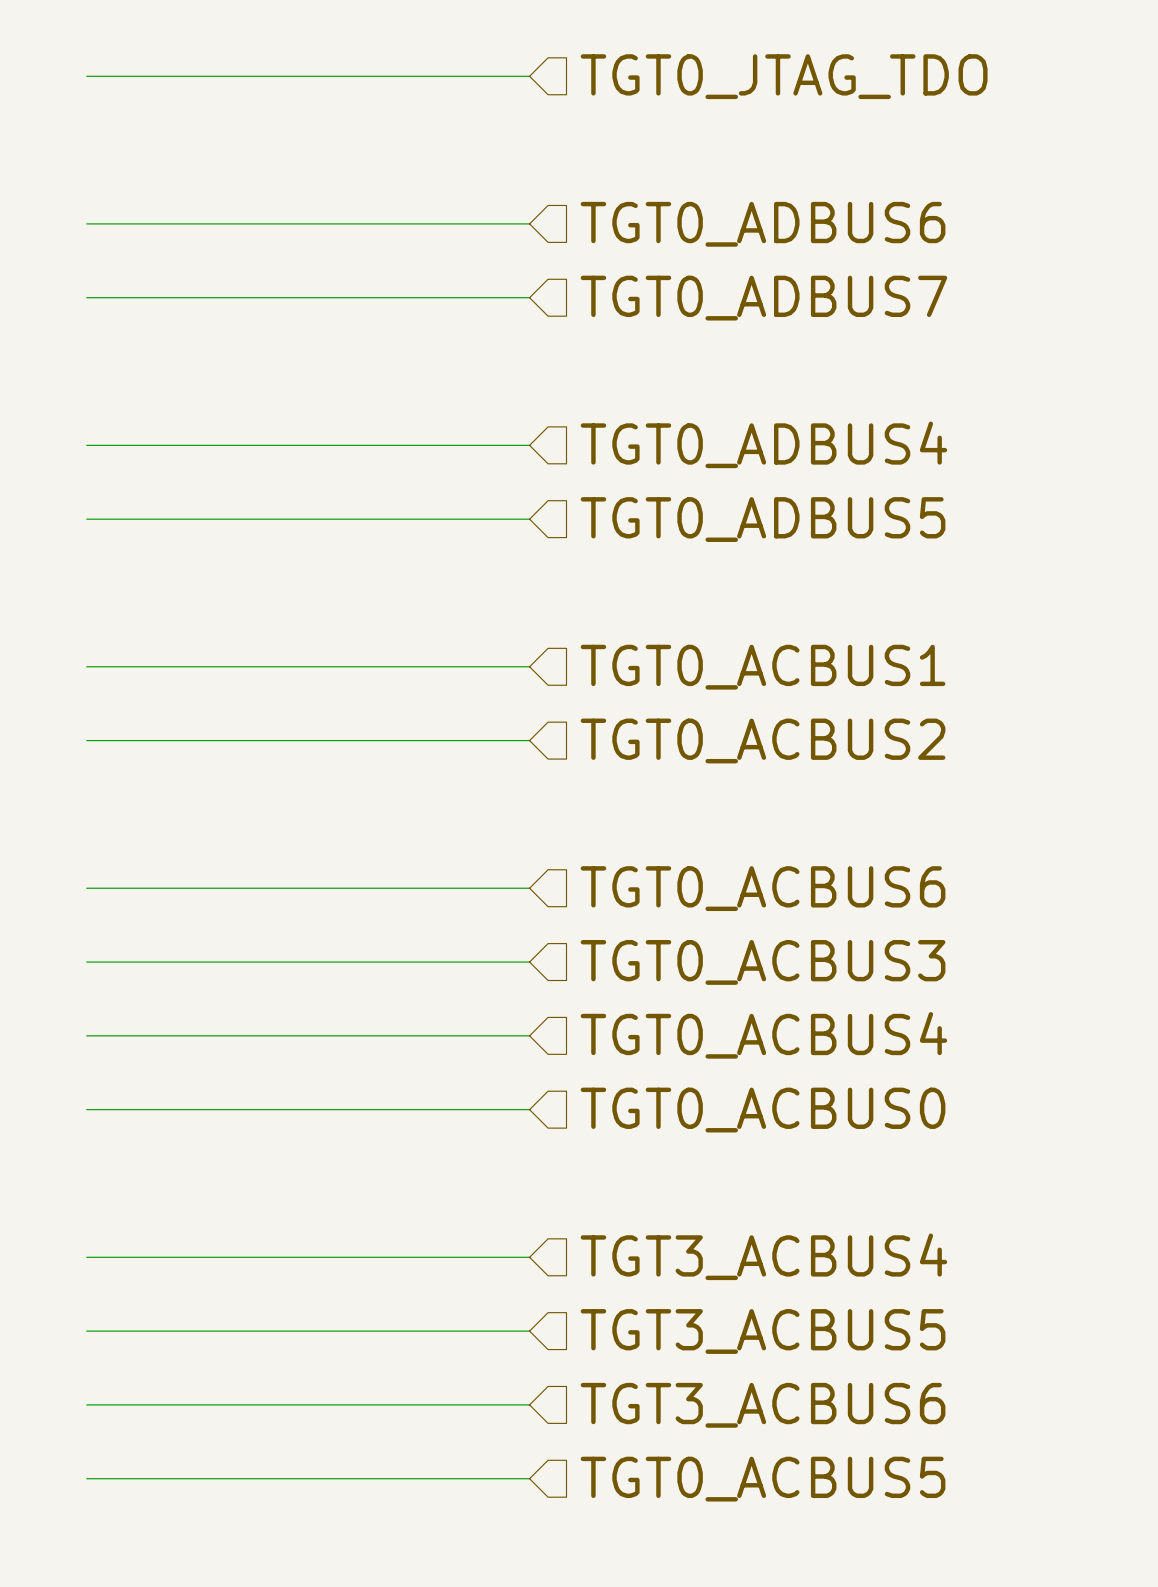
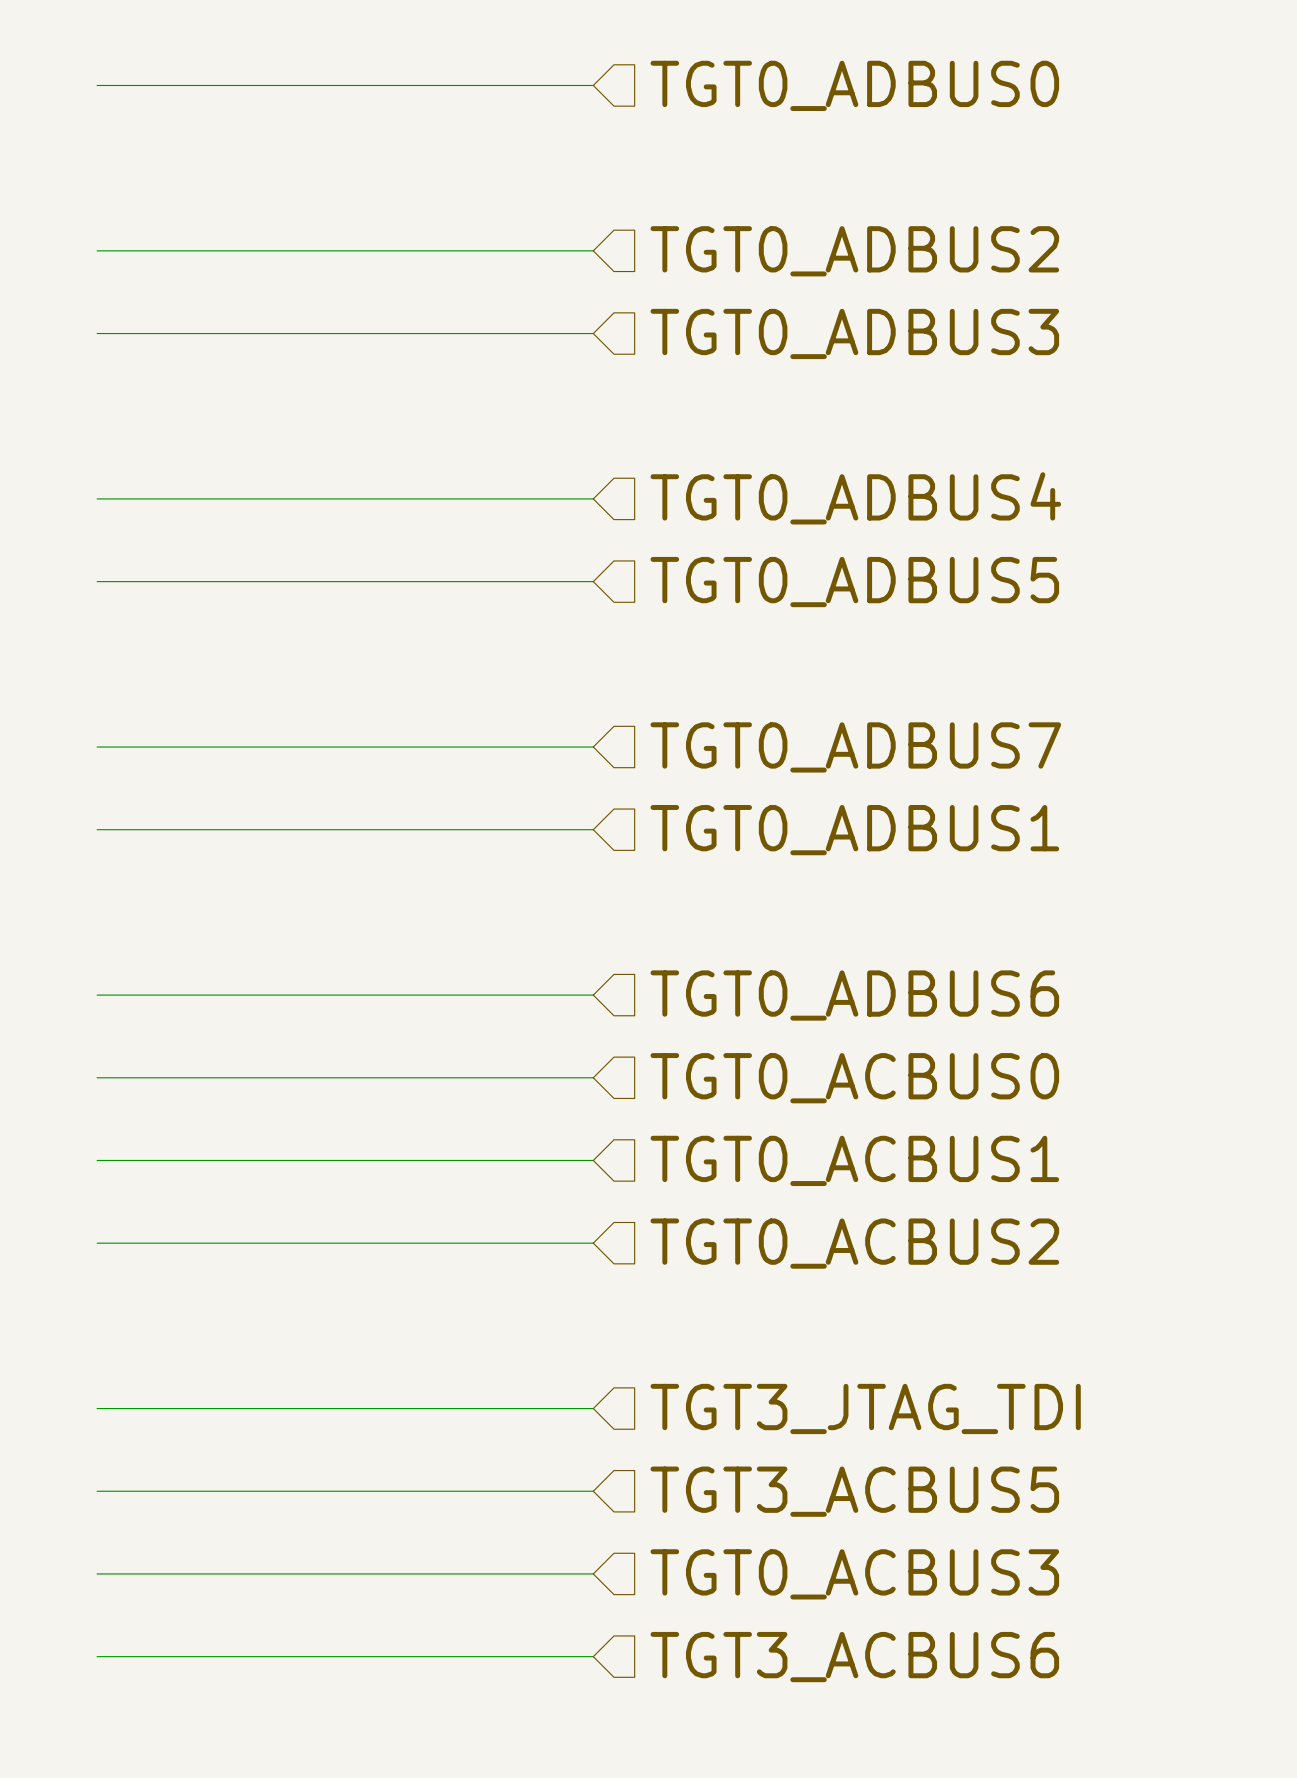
hierarchical label: TGT0_JTAG_TDO (784, 76) -> TGT0_ADBUS0 (854, 85)
hierarchical label: TGT0_ADBUS6 (763, 224) -> TGT0_ADBUS2 (854, 251)
hierarchical label: TGT0_ADBUS7 (763, 298) -> TGT0_ADBUS3 (854, 333)
hierarchical label: TGT0_ACBUS1 (763, 667) -> TGT0_ADBUS7 (855, 747)
hierarchical label: TGT0_ACBUS2 (763, 740) -> TGT0_ADBUS1 (854, 830)
hierarchical label: TGT0_ACBUS6 (763, 888) -> TGT0_ADBUS6 (854, 995)
hierarchical label: TGT0_ACBUS3 (763, 962) -> TGT0_ACBUS0 (854, 1078)
hierarchical label: TGT0_ACBUS4 (763, 1035) -> TGT0_ACBUS1 (854, 1160)
hierarchical label: TGT0_ACBUS0 (763, 1110) -> TGT0_ACBUS2 (854, 1243)
hierarchical label: TGT3_ACBUS4 (763, 1256) -> TGT3_JTAG_TDI (865, 1408)
hierarchical label: TGT3_ACBUS6 (763, 1405) -> TGT0_ACBUS3 (854, 1574)
hierarchical label: TGT0_ACBUS5 (763, 1479) -> TGT3_ACBUS6 (854, 1657)

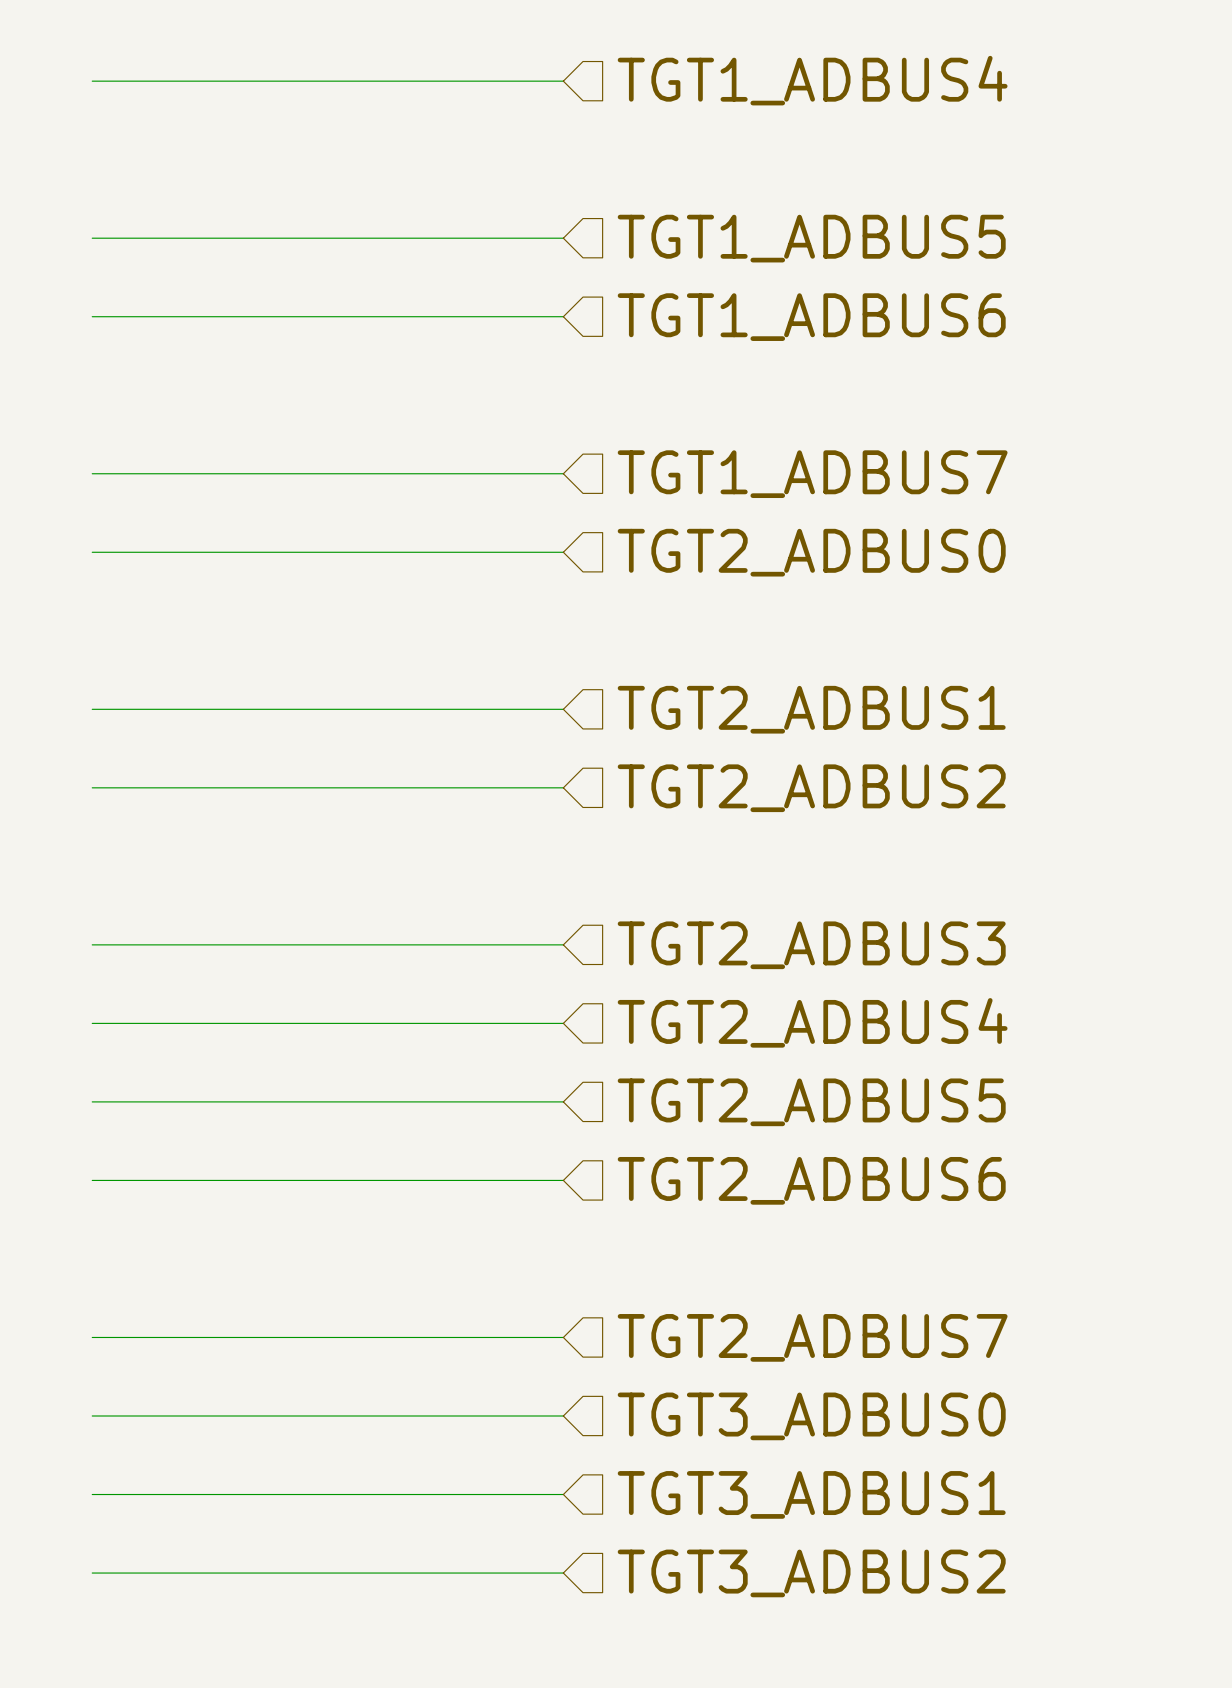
hierarchical label: TGT0_ADBUS0 (854, 85) -> TGT1_ADBUS4 (812, 80)
hierarchical label: TGT0_ADBUS2 (854, 251) -> TGT1_ADBUS5 (811, 238)
hierarchical label: TGT0_ADBUS3 (854, 333) -> TGT1_ADBUS6 (811, 317)
hierarchical label: TGT0_ADBUS4 (855, 498) -> TGT1_ADBUS7 (812, 474)
hierarchical label: TGT0_ADBUS5 (854, 582) -> TGT2_ADBUS0 (811, 552)
hierarchical label: TGT0_ADBUS7 (855, 747) -> TGT2_ADBUS1 (811, 709)
hierarchical label: TGT0_ADBUS1 (854, 830) -> TGT2_ADBUS2 (811, 788)
hierarchical label: TGT0_ADBUS6 (854, 995) -> TGT2_ADBUS3 (811, 945)
hierarchical label: TGT0_ACBUS0 (854, 1078) -> TGT2_ADBUS4 (812, 1022)
hierarchical label: TGT0_ACBUS1 (854, 1160) -> TGT2_ADBUS5 (811, 1102)
hierarchical label: TGT0_ACBUS2 (854, 1243) -> TGT2_ADBUS6 (811, 1180)
hierarchical label: TGT3_JTAG_TDI (865, 1408) -> TGT2_ADBUS7 (812, 1337)
hierarchical label: TGT3_ACBUS5 (854, 1491) -> TGT3_ADBUS0 (811, 1416)
hierarchical label: TGT0_ACBUS3 (854, 1574) -> TGT3_ADBUS1 (811, 1494)
hierarchical label: TGT3_ACBUS6 (854, 1657) -> TGT3_ADBUS2 (811, 1573)

